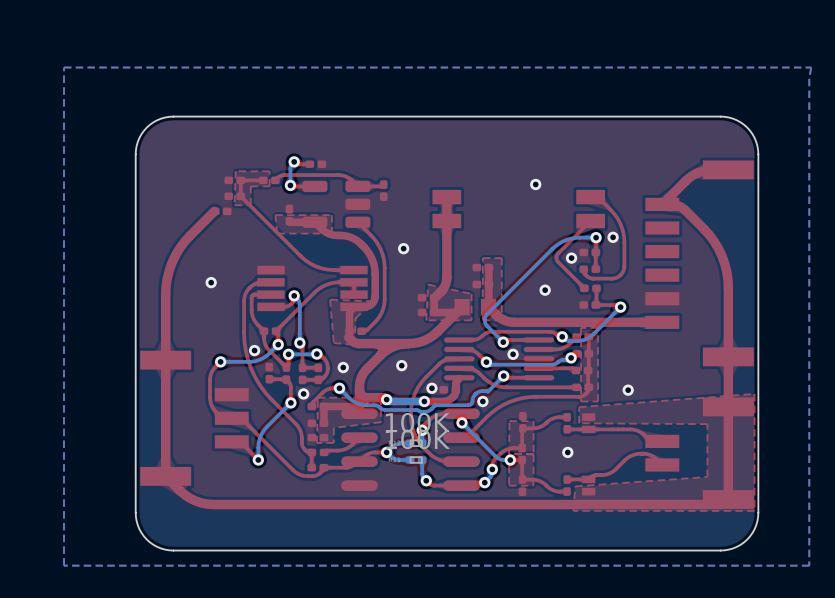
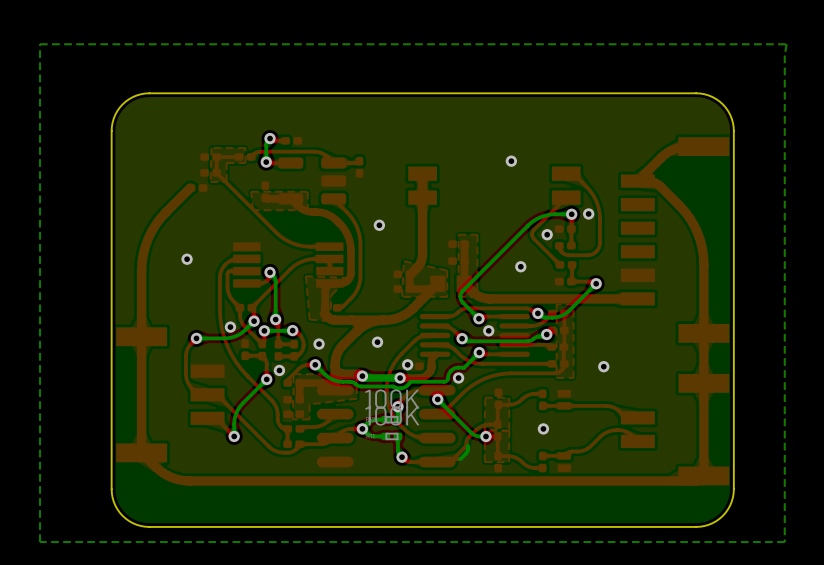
top zone outline: (754, 393) (754, 510) (573, 510) (575, 486) (707, 476) (707, 424) (579, 423) (579, 407) (754, 393) -> none
top track: (514, 448) (504, 450) (494, 459) (492, 471) -> (489, 424) (475, 430) (467, 439) (464, 447) (452, 459) (445, 461) (430, 462)
via: (492, 469) -> none
via: (484, 482) -> none

